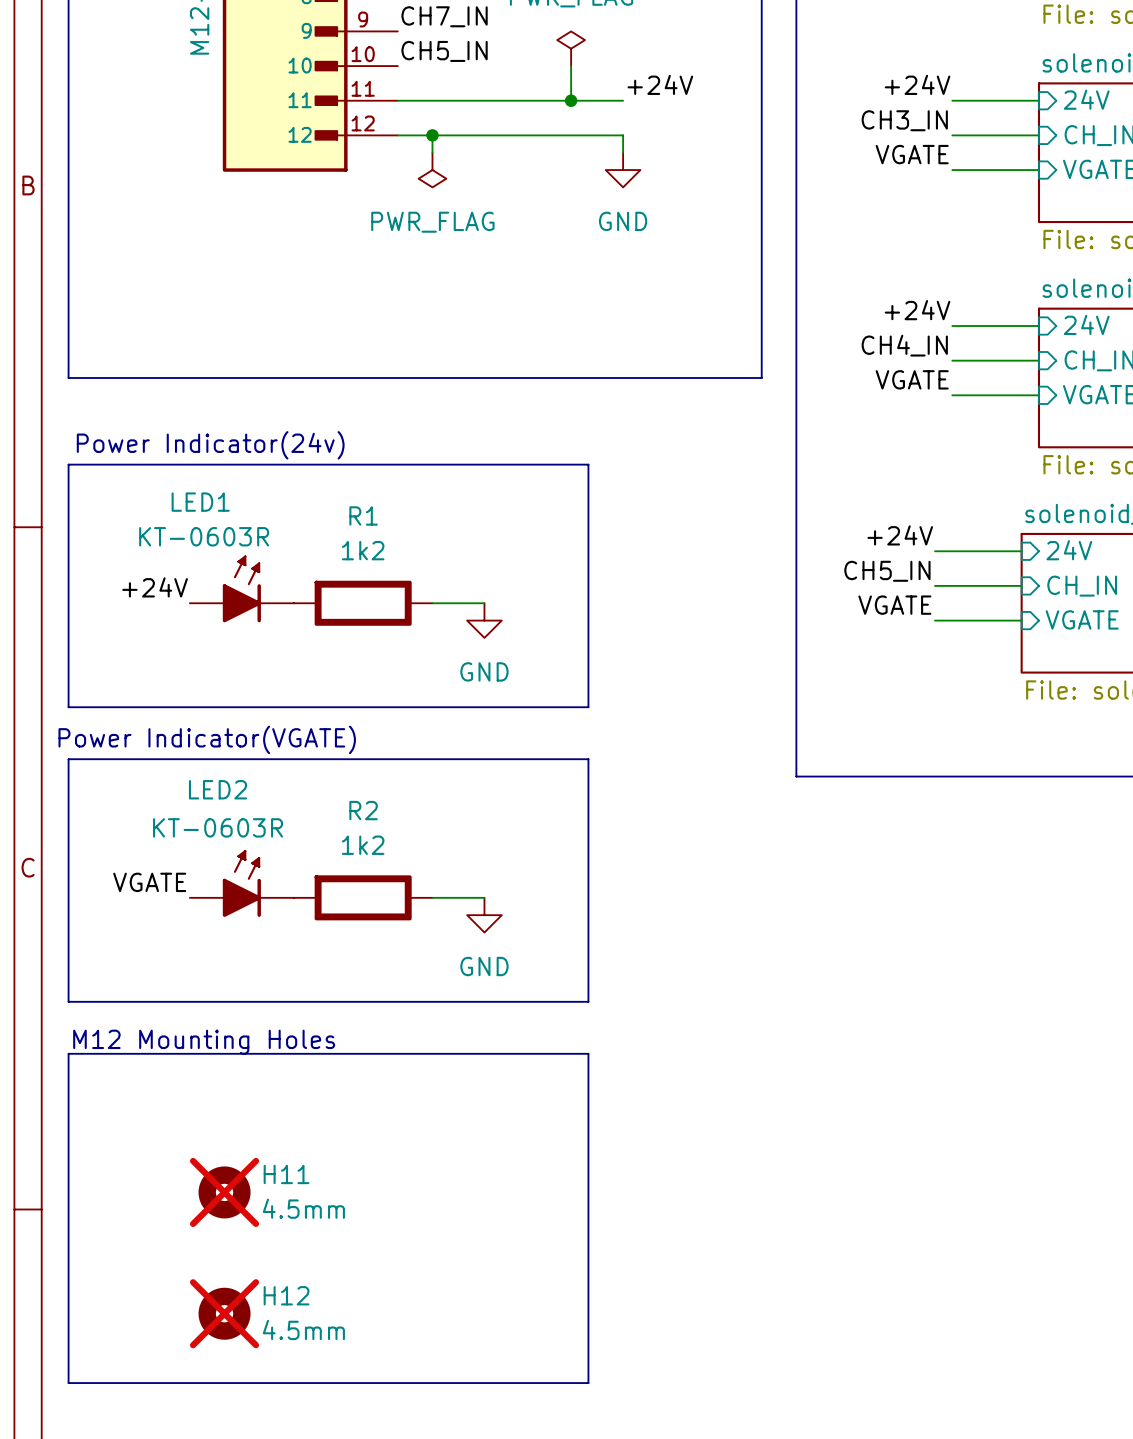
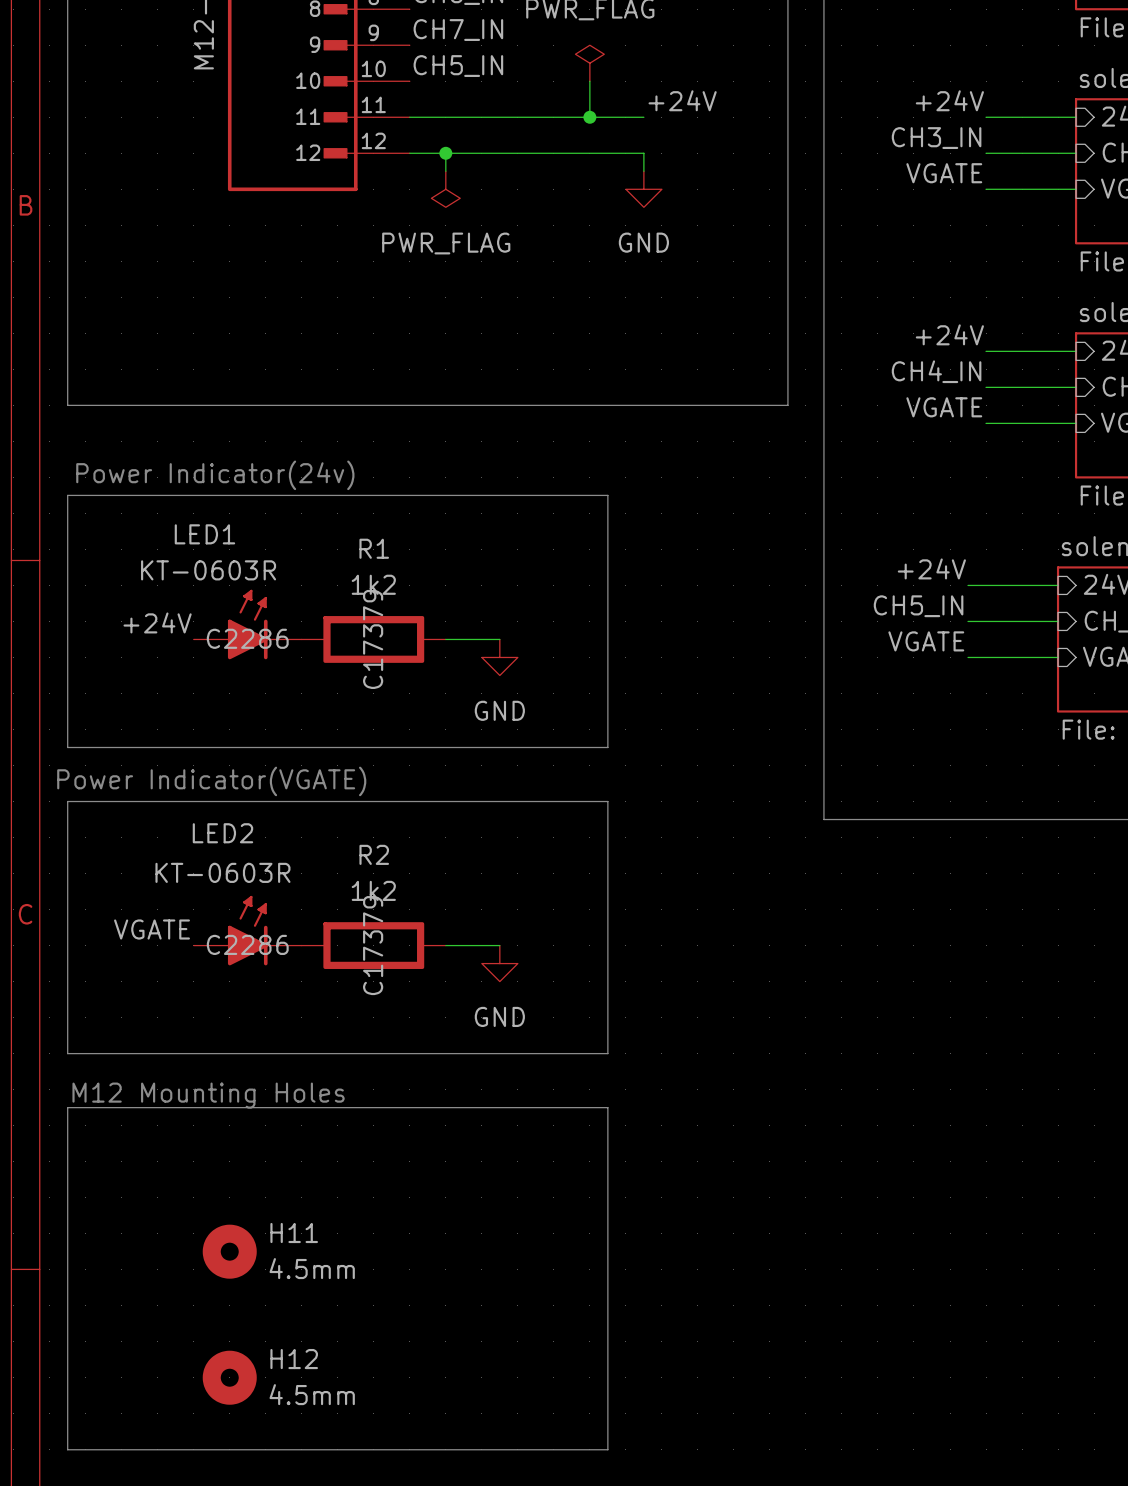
LED1 text: none -> C2286 (247, 638)
R1 text: none -> C17379 (373, 639)
LED2 text: none -> C2286 (247, 944)
R2 text: none -> C17379 (373, 945)
H11 do-not-place cross: (224, 1192) -> none
H12 do-not-place cross: (224, 1313) -> none

